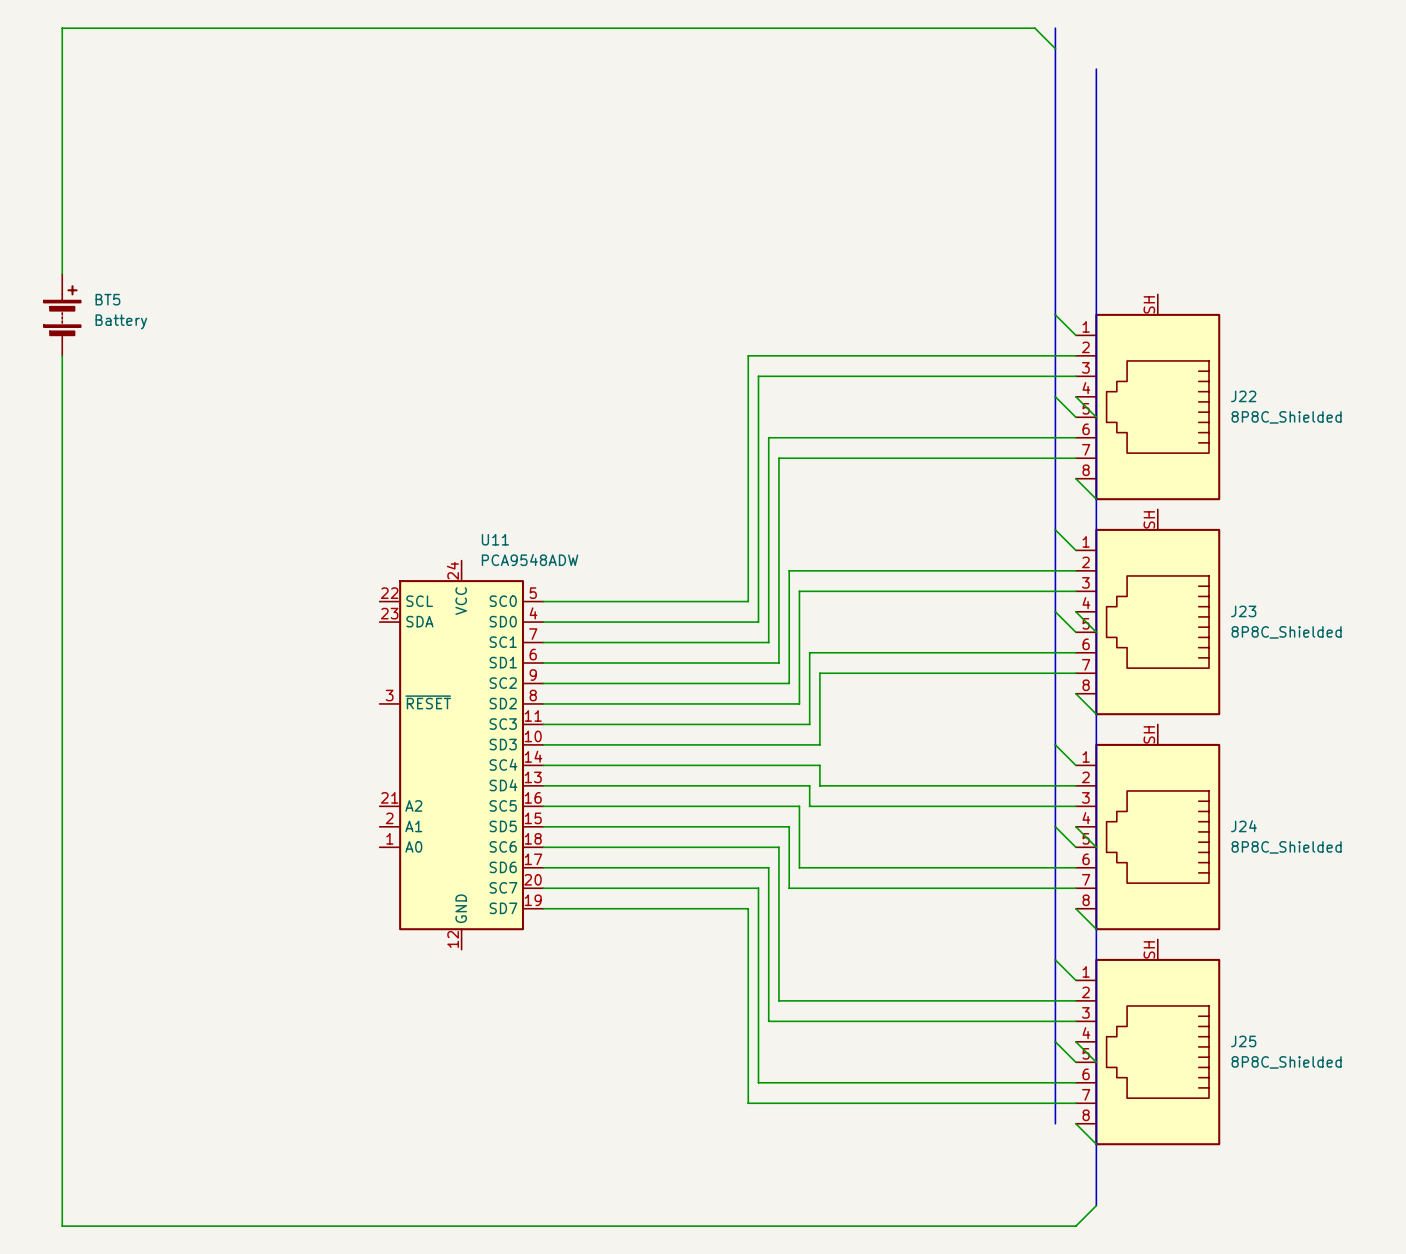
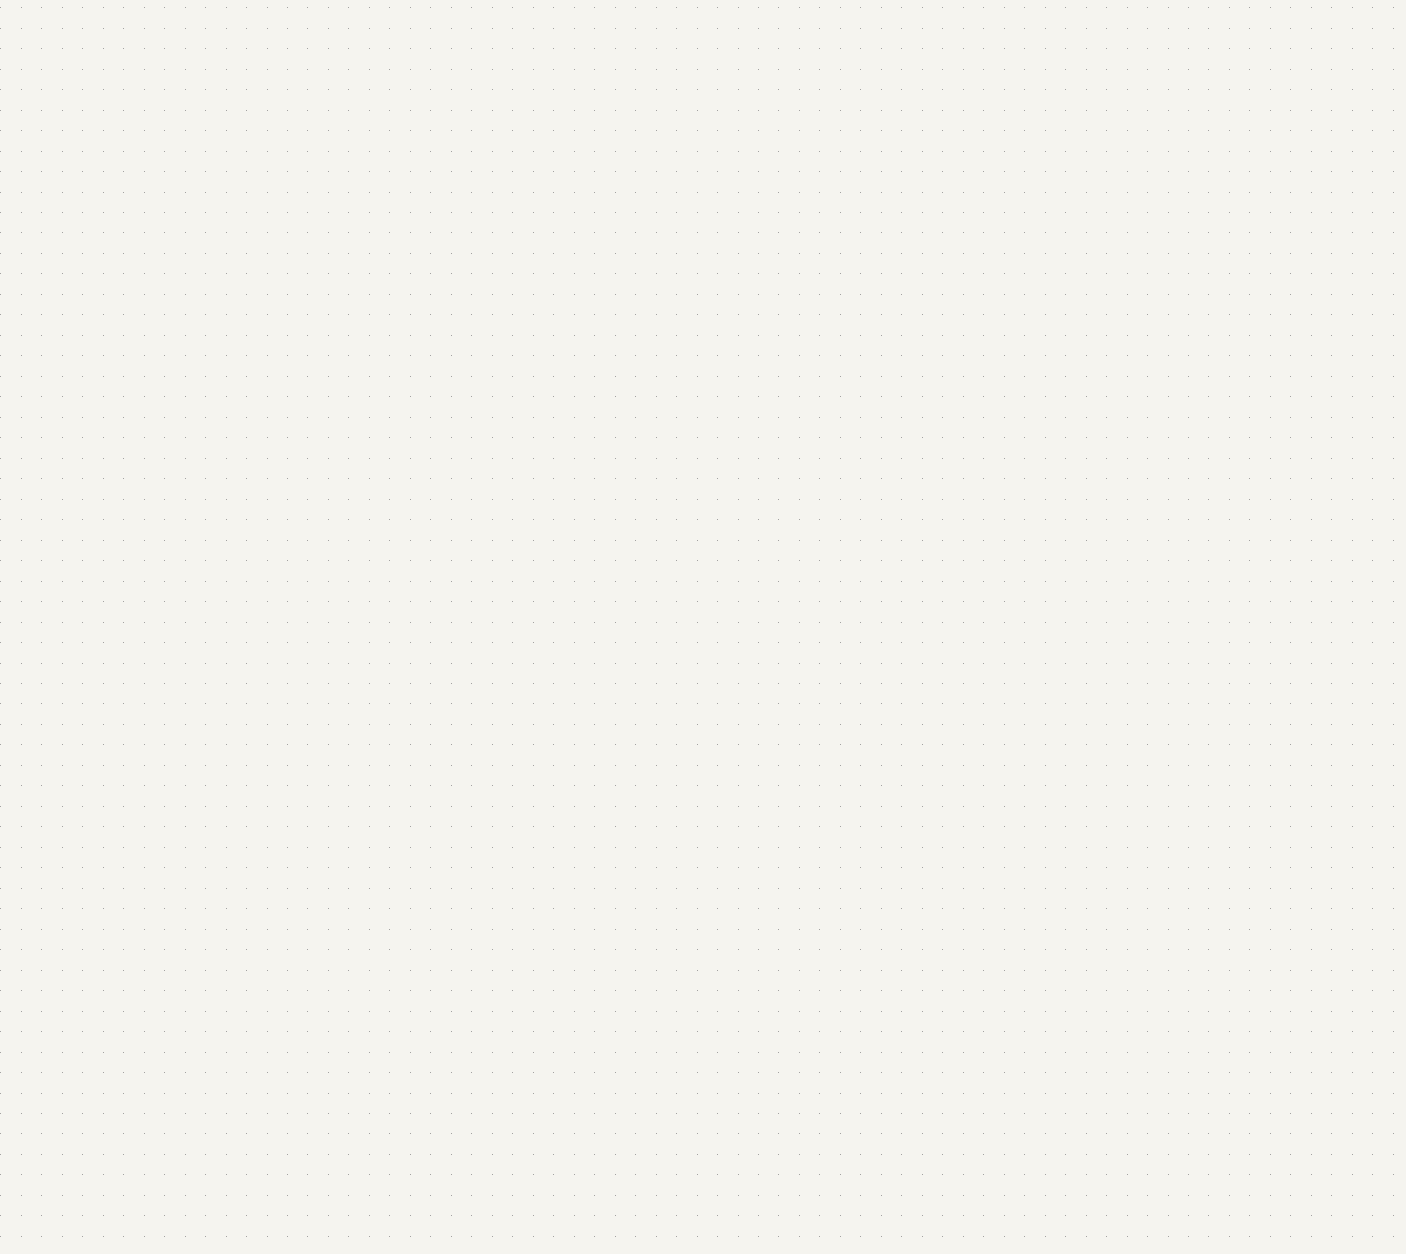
bus: (1055, 28) (1055, 1123) -> none
wire: (1055, 48) (1034, 28) (62, 28) (62, 273) -> none
bus: (1096, 69) (1096, 1205) -> none
BT5: Battery (62, 314) -> none
wire: (1055, 314) (1075, 335) -> none
wire: (62, 355) (62, 1226) (1075, 1226) (1096, 1205) -> none
wire: (1075, 355) (748, 355) (748, 601) (543, 601) -> none
wire: (1075, 376) (758, 376) (758, 622) (543, 622) -> none
wire: (1055, 396) (1075, 417) -> none
wire: (1075, 396) (1096, 417) -> none
J22: 8P8C_Shielded (1148, 397) -> none
wire: (1075, 437) (768, 437) (768, 642) (543, 642) -> none
wire: (1075, 458) (778, 458) (778, 663) (543, 663) -> none
wire: (1075, 478) (1096, 499) -> none
wire: (1055, 529) (1075, 550) -> none
wire: (1075, 570) (789, 570) (789, 683) (543, 683) -> none
wire: (1075, 591) (799, 591) (799, 703) (543, 703) -> none
wire: (1055, 611) (1075, 632) -> none
wire: (1075, 611) (1096, 632) -> none
J23: 8P8C_Shielded (1148, 612) -> none
wire: (1075, 652) (809, 652) (809, 724) (543, 724) -> none
wire: (1075, 673) (819, 673) (819, 744) (543, 744) -> none
wire: (1075, 693) (1096, 714) -> none
wire: (1055, 744) (1075, 765) -> none
U11: PCA9548ADW (461, 755) -> none
wire: (543, 765) (819, 765) (819, 785) (1075, 785) -> none
wire: (543, 785) (809, 785) (809, 806) (1075, 806) -> none
wire: (543, 806) (799, 806) (799, 867) (1075, 867) -> none
wire: (543, 826) (789, 826) (789, 888) (1075, 888) -> none
wire: (1055, 826) (1075, 847) -> none
wire: (1075, 826) (1096, 847) -> none
J24: 8P8C_Shielded (1148, 827) -> none
wire: (543, 847) (778, 847) (778, 1000) (1075, 1000) -> none
wire: (543, 867) (768, 867) (768, 1021) (1075, 1021) -> none
wire: (543, 888) (758, 888) (758, 1082) (1075, 1082) -> none
wire: (543, 908) (748, 908) (748, 1103) (1075, 1103) -> none
wire: (1075, 908) (1096, 929) -> none
wire: (1055, 959) (1075, 980) -> none
wire: (1055, 1041) (1075, 1062) -> none
wire: (1075, 1041) (1096, 1062) -> none
J25: 8P8C_Shielded (1148, 1042) -> none
wire: (1075, 1123) (1096, 1144) -> none

